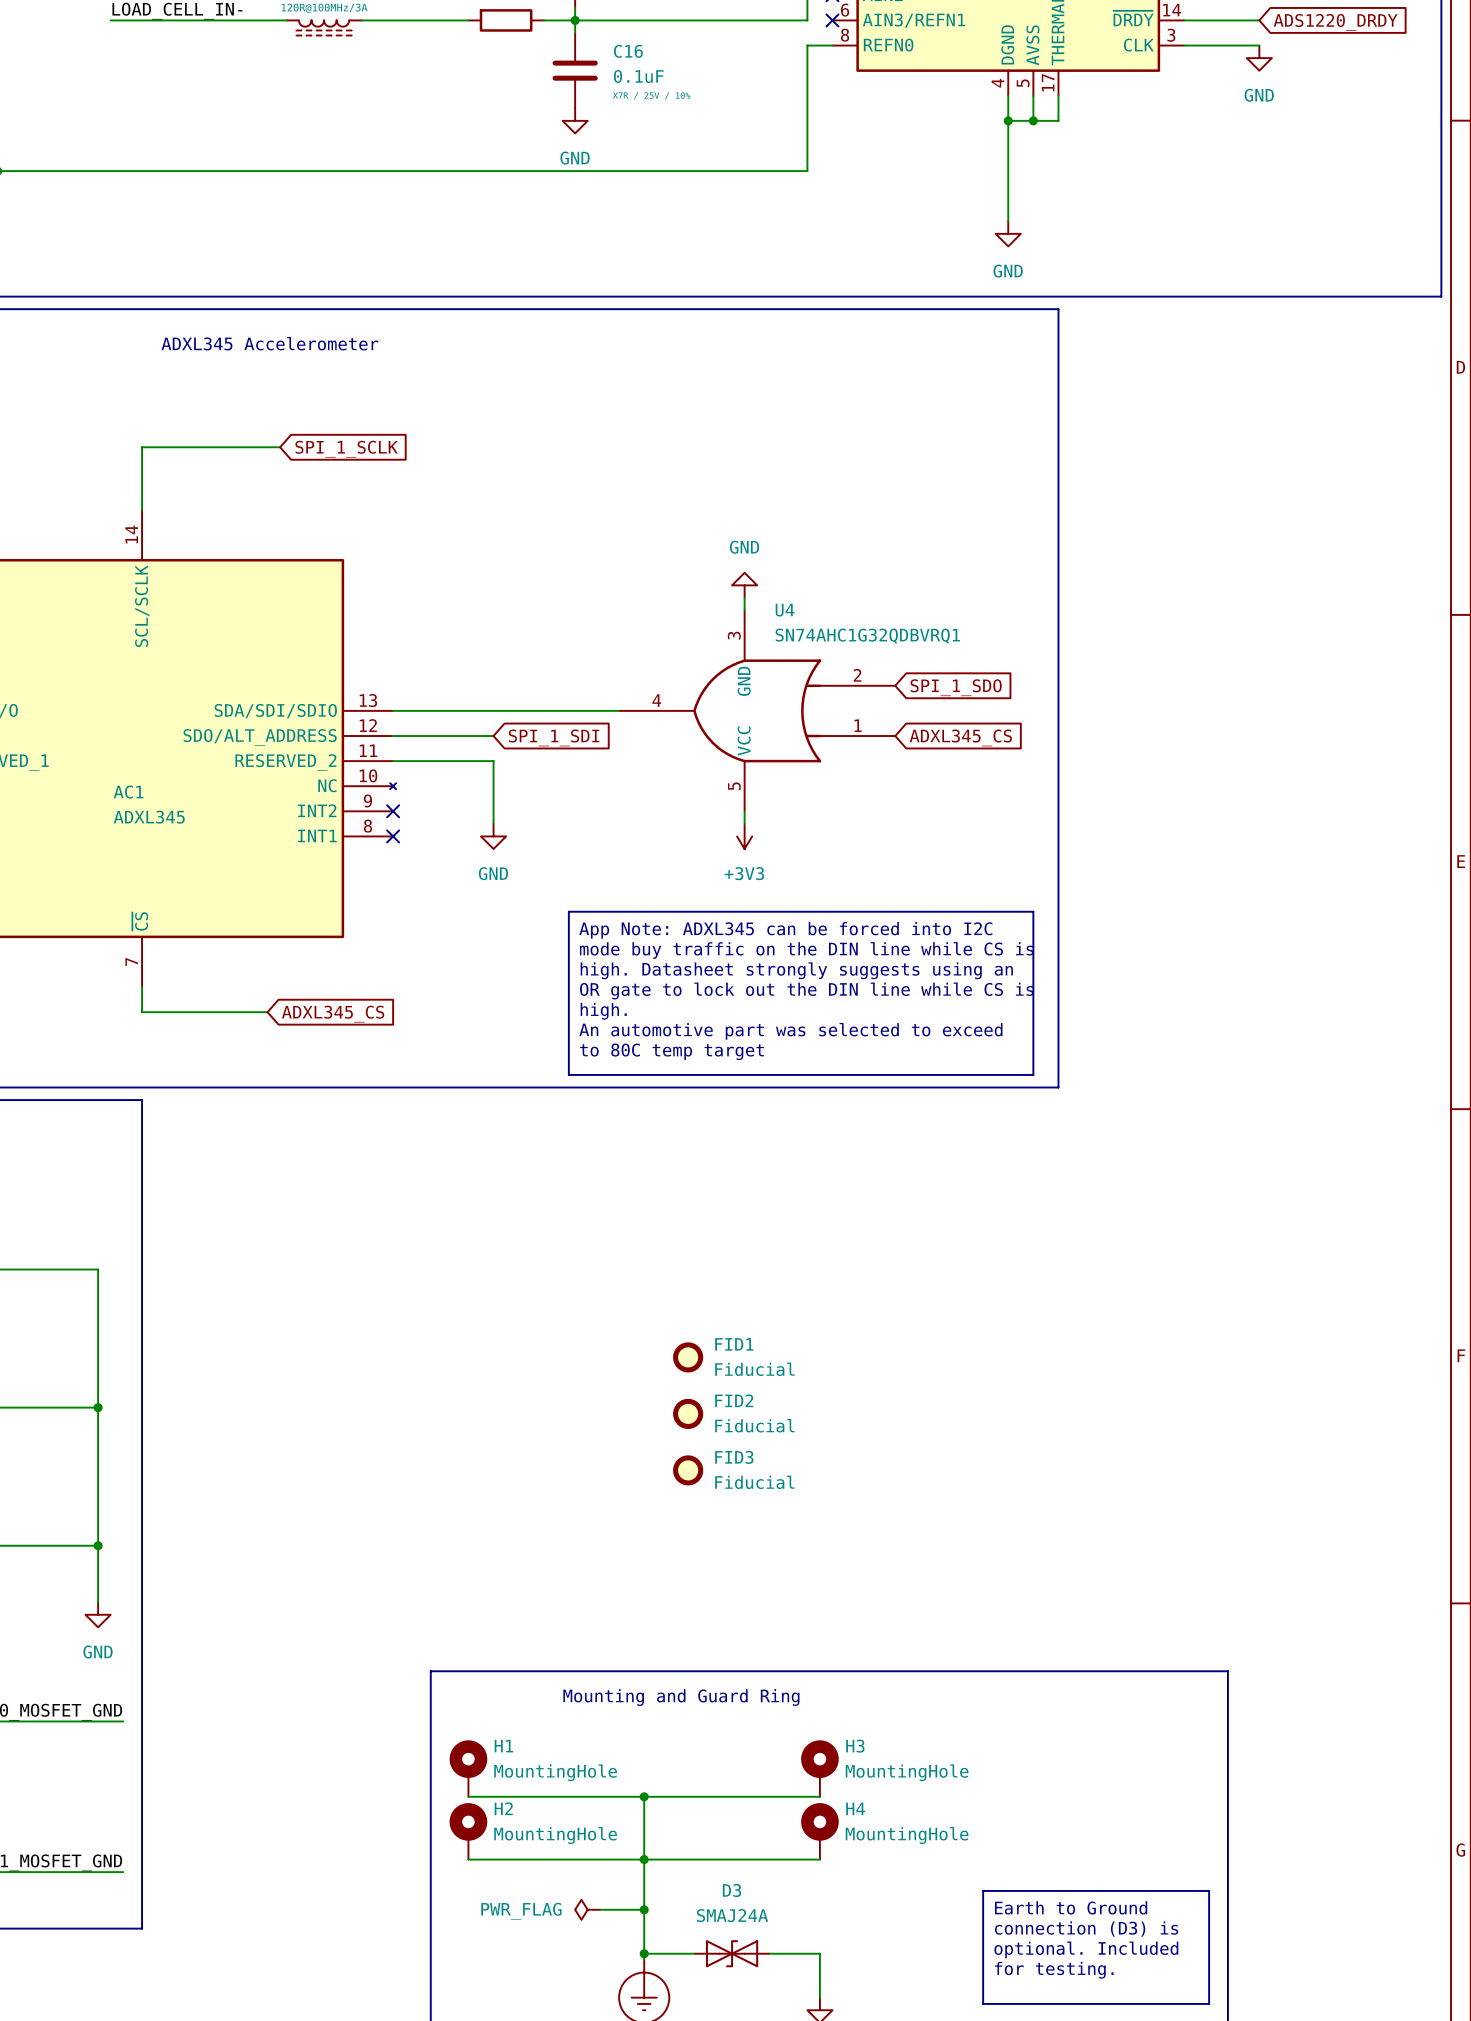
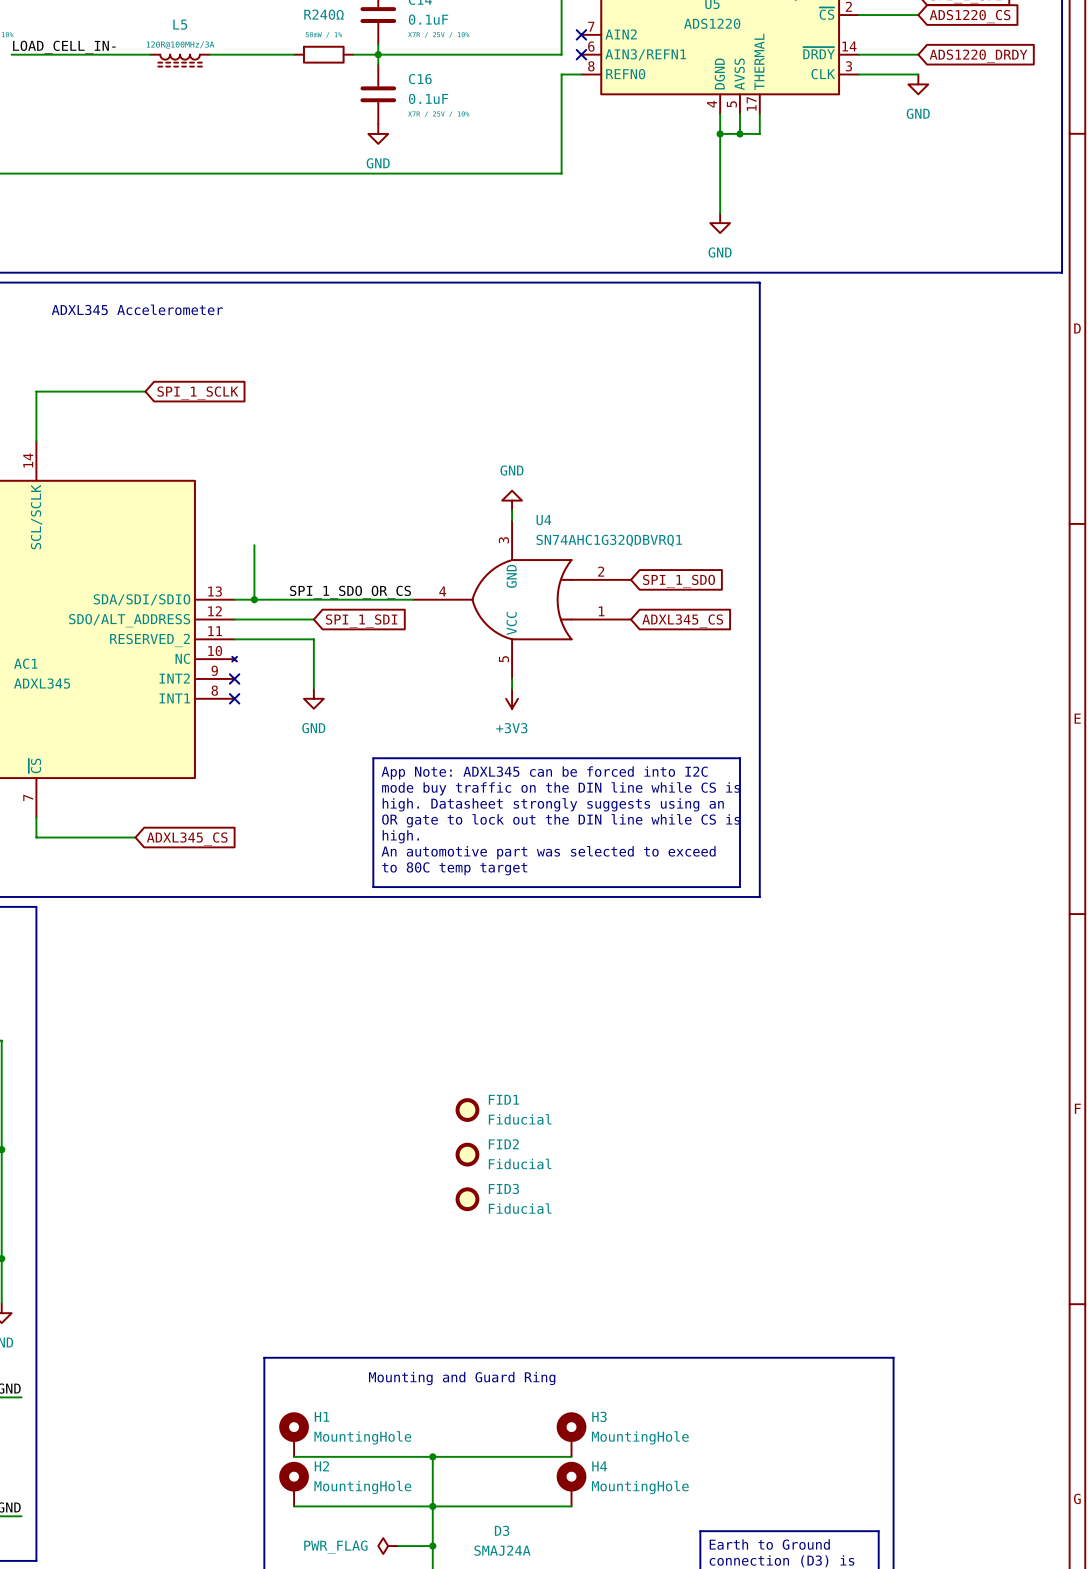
wire: none -> (254, 545) (254, 599)
label: none -> SPI_1_SDO_OR_CS (350, 592)
junction: none -> (254, 599)

